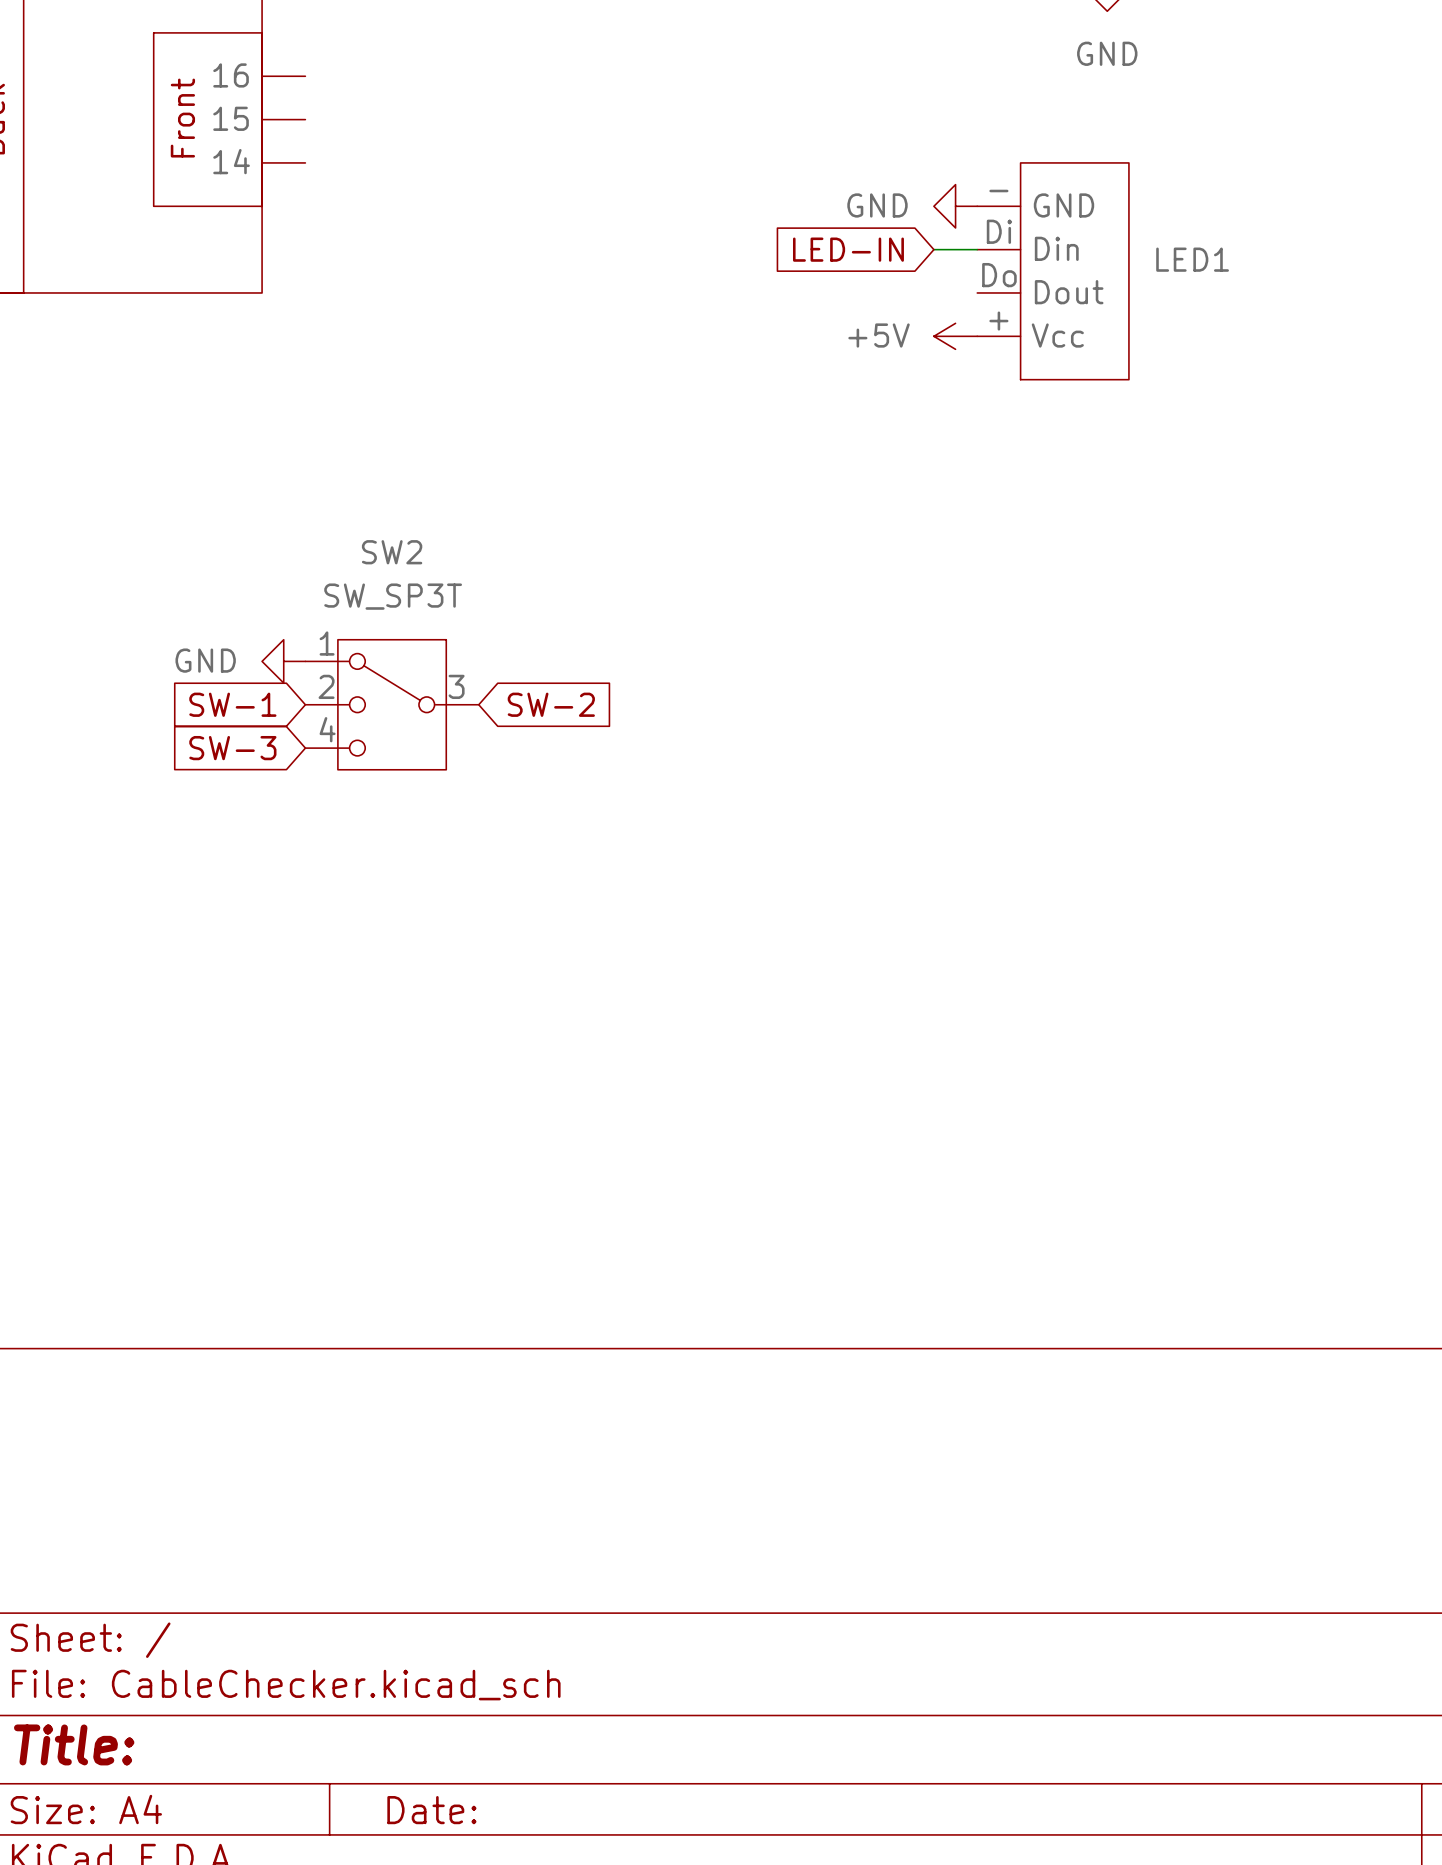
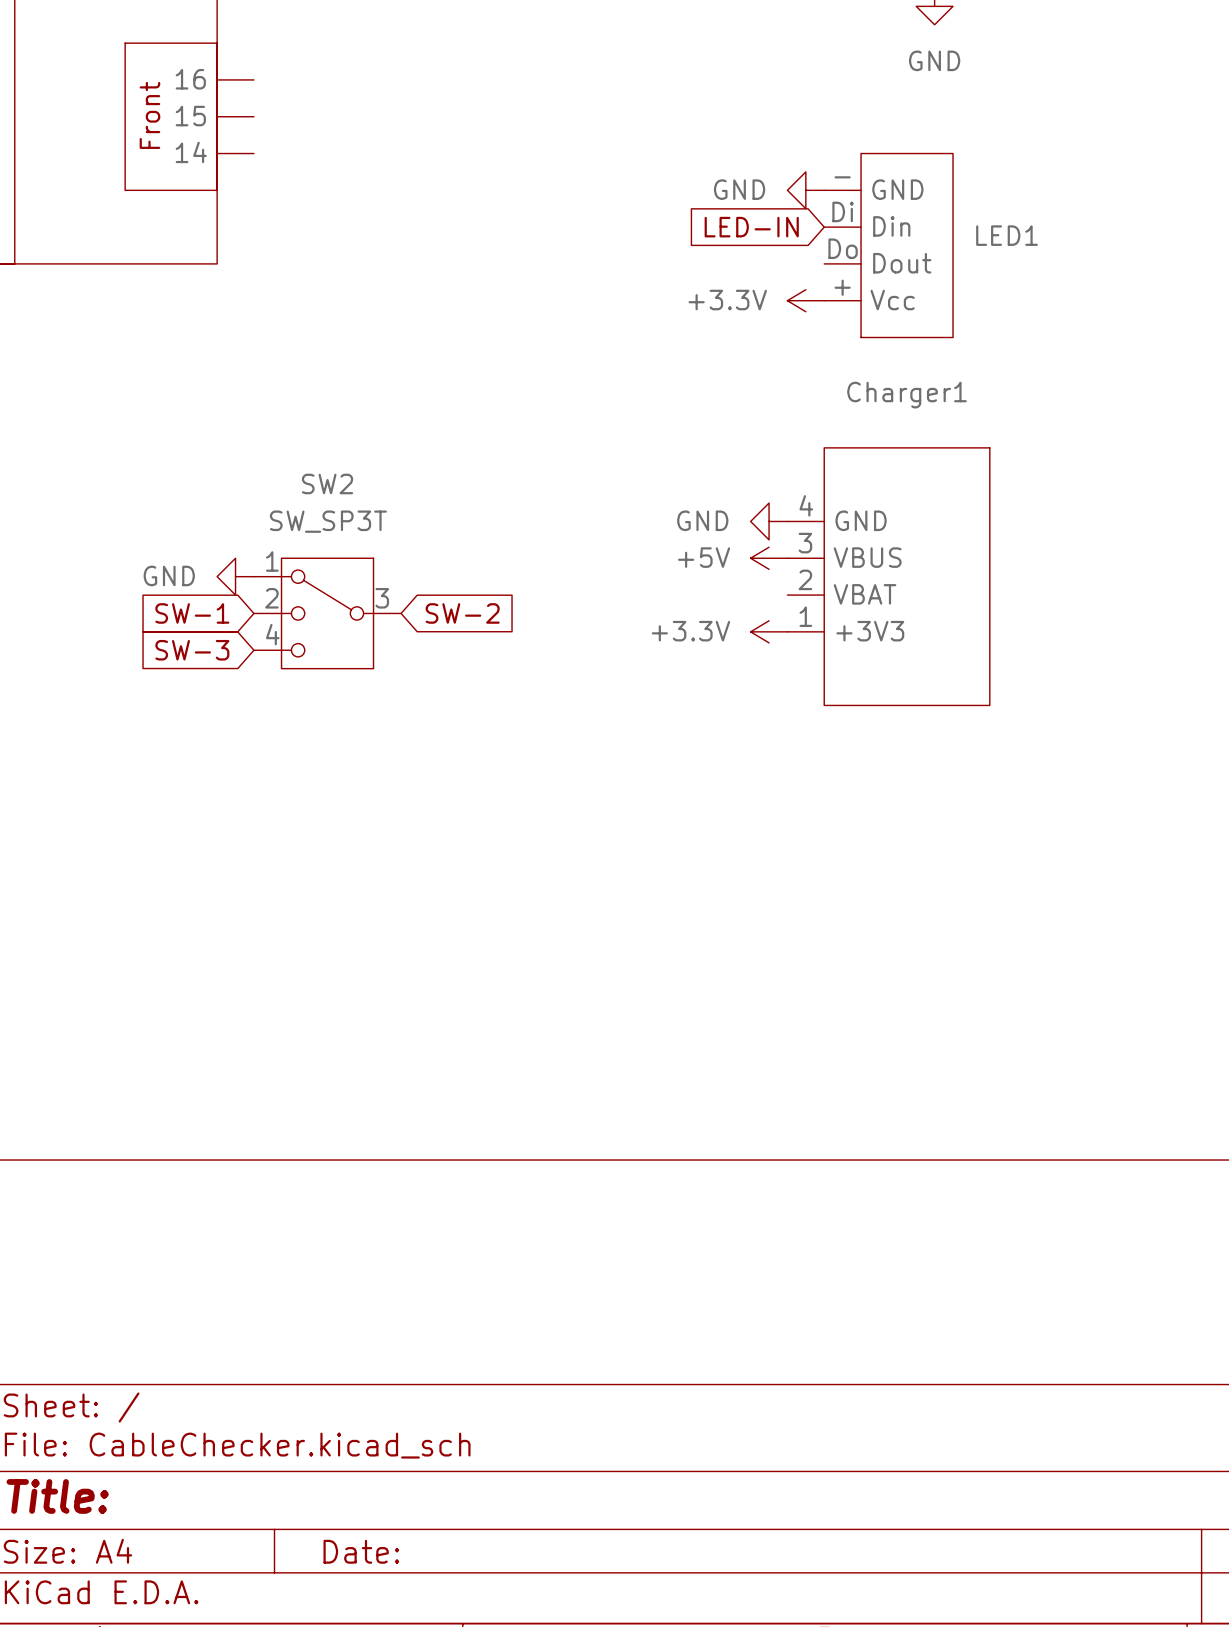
global label position: LED-IN (848, 249) -> LED-IN (751, 227)
wire: (933, 249) (977, 249) -> none
power symbol: +5V (955, 336) -> +3.3V (805, 300)
power symbol: none -> GND (769, 521)
power symbol: none -> +5V (769, 558)
Charger1: none -> (888, 576)
power symbol: none -> +3.3V (769, 631)

